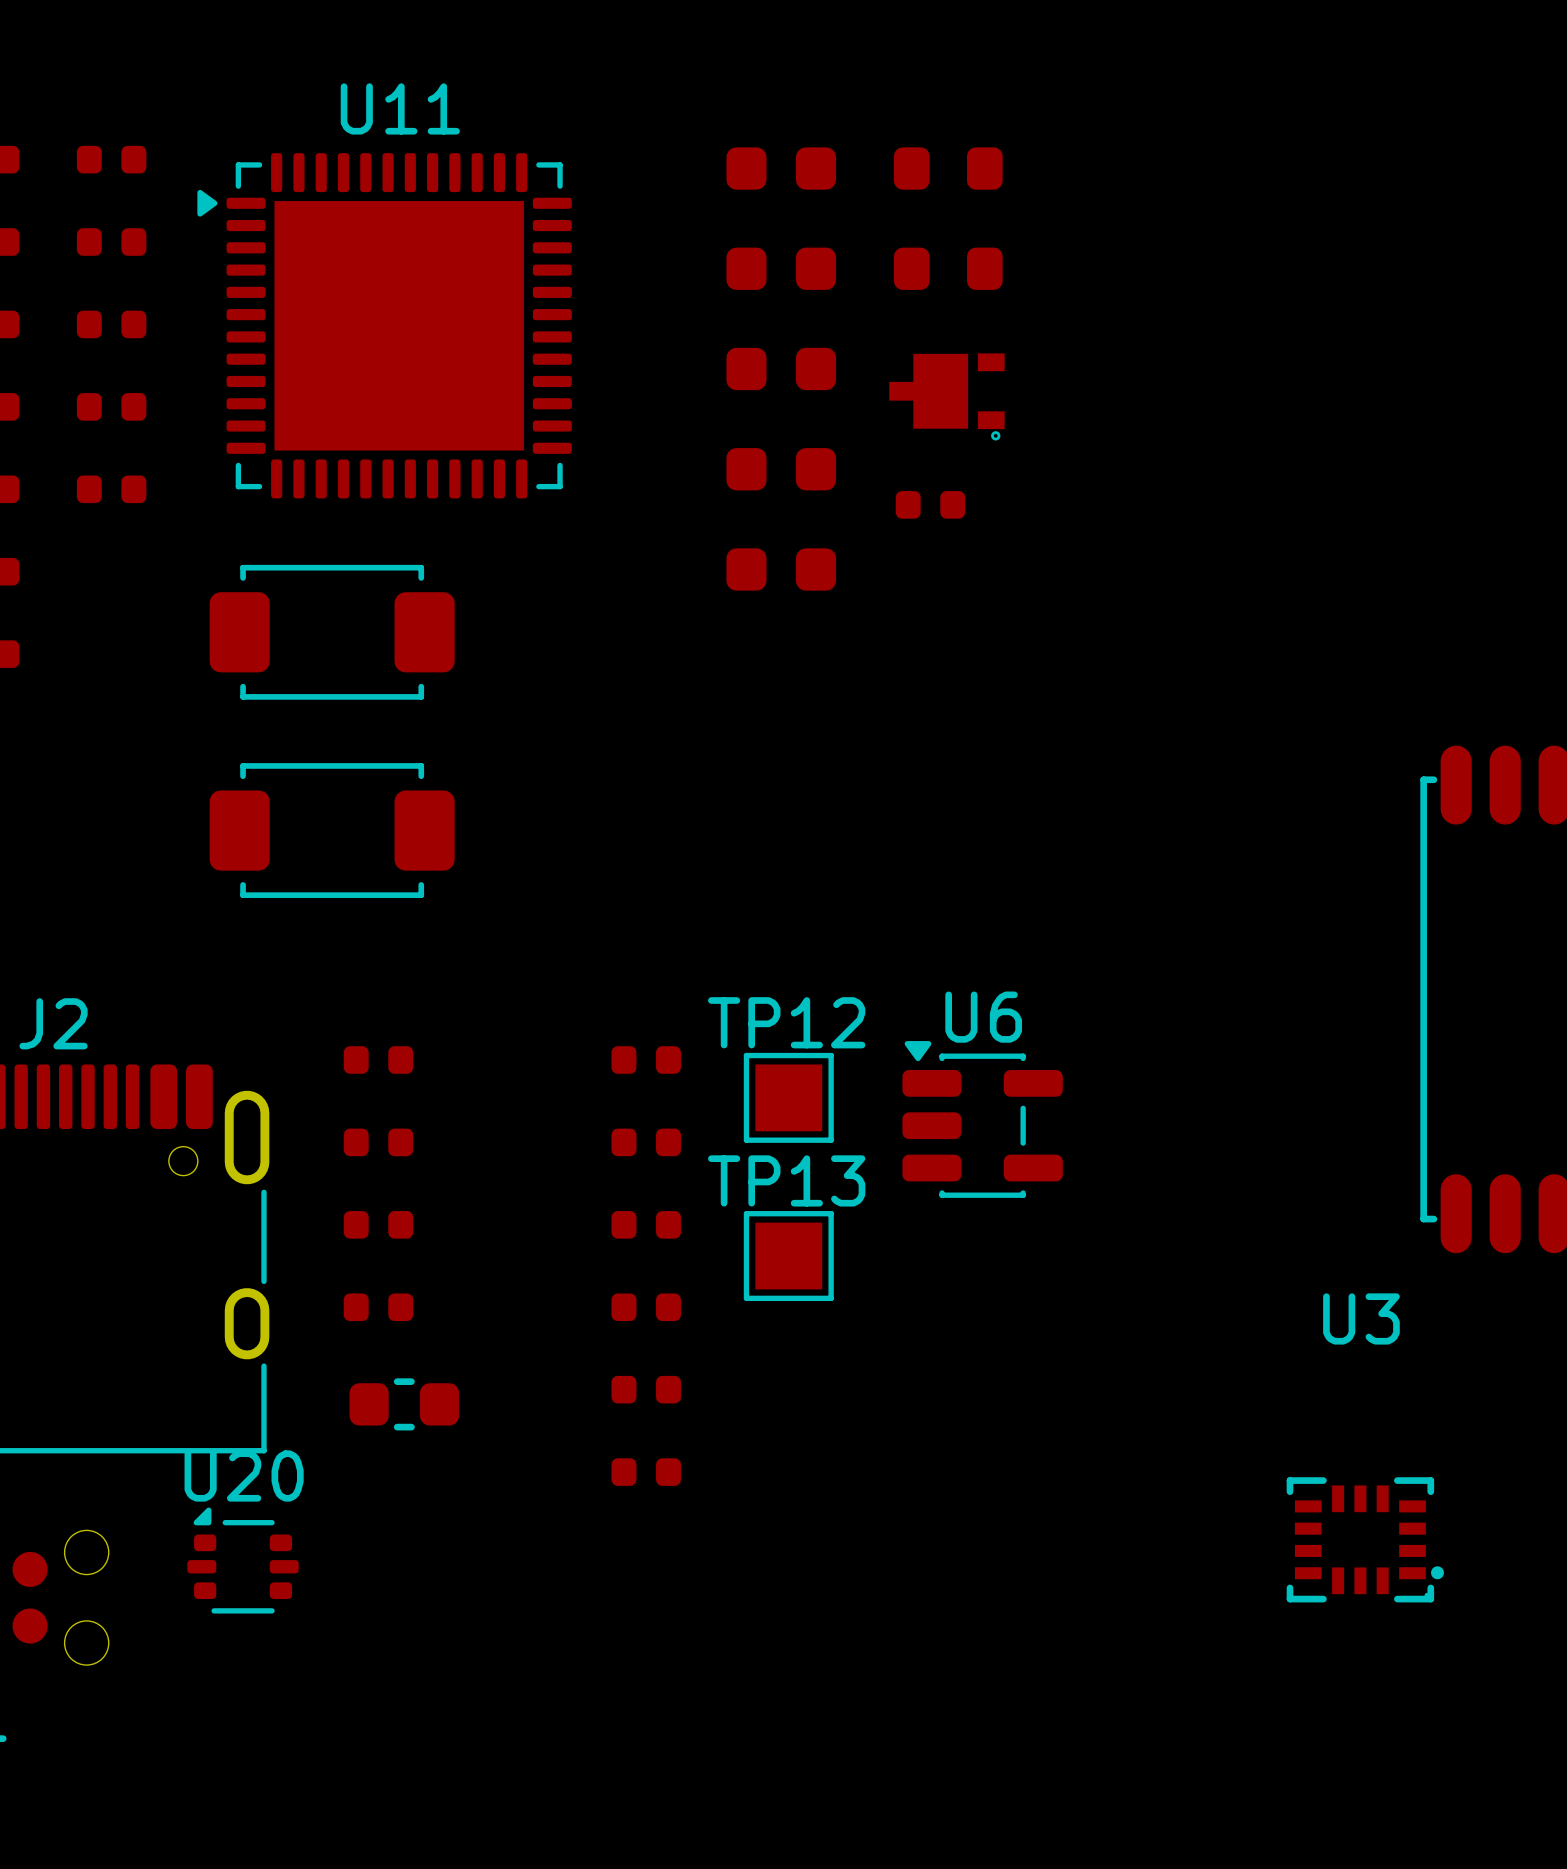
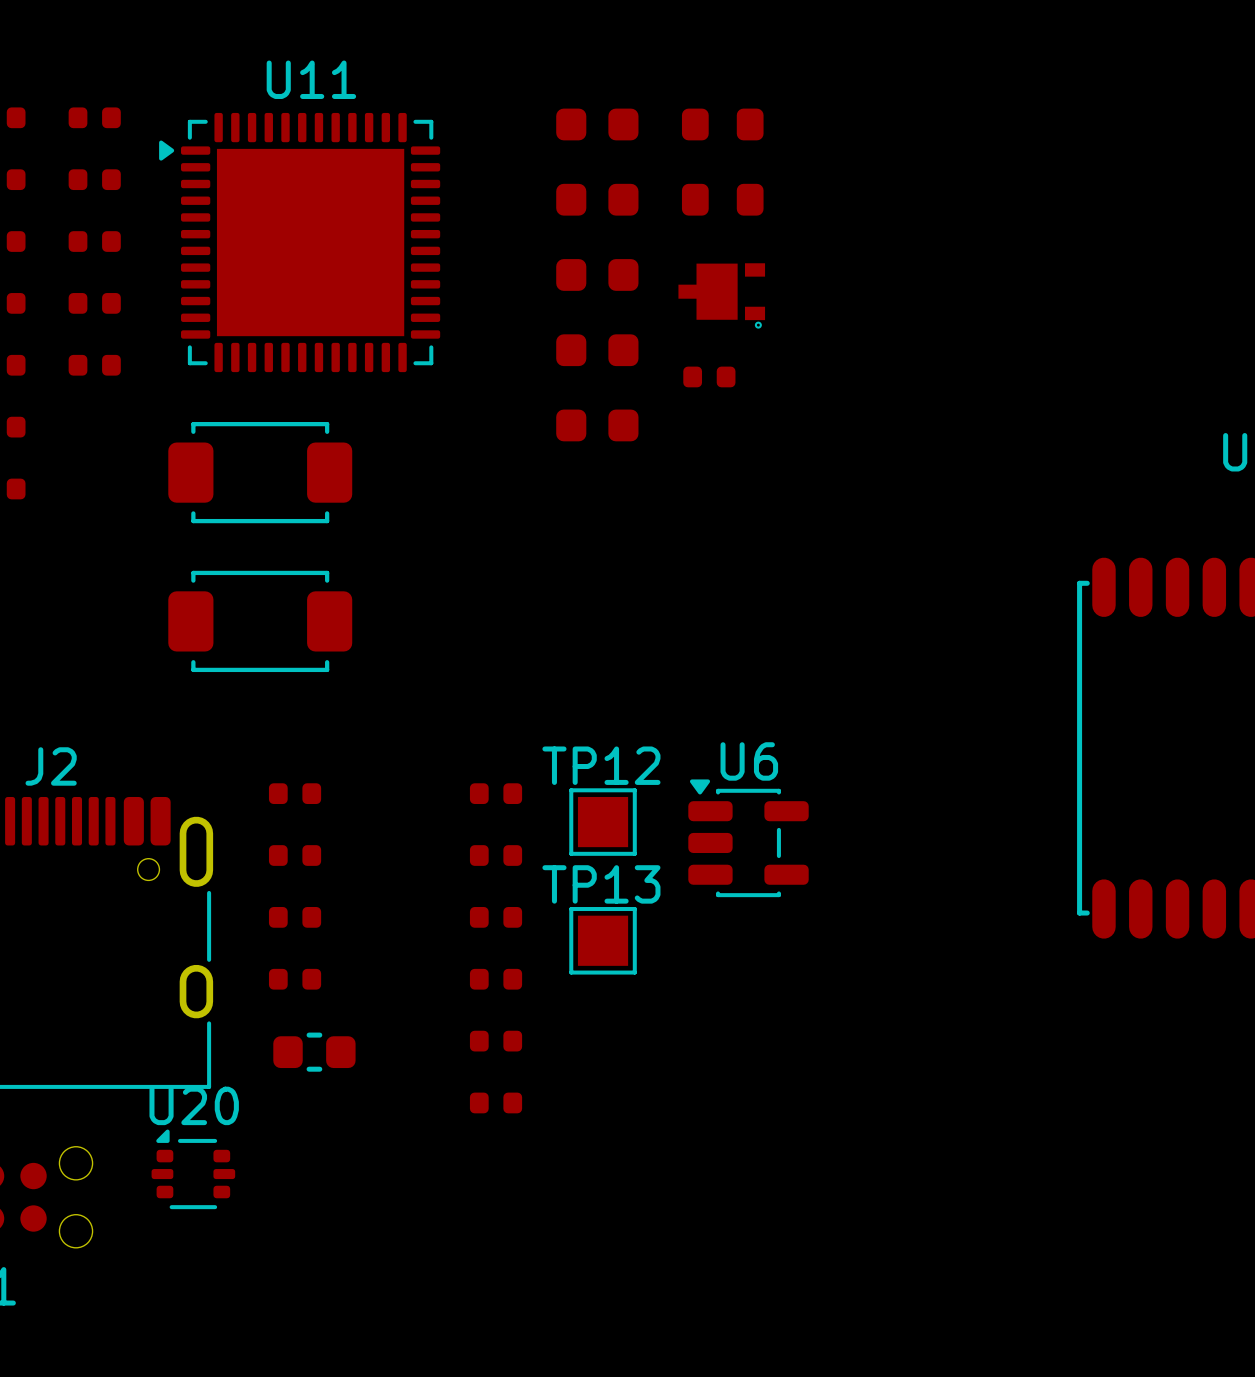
U3: (1365, 1539) -> none

